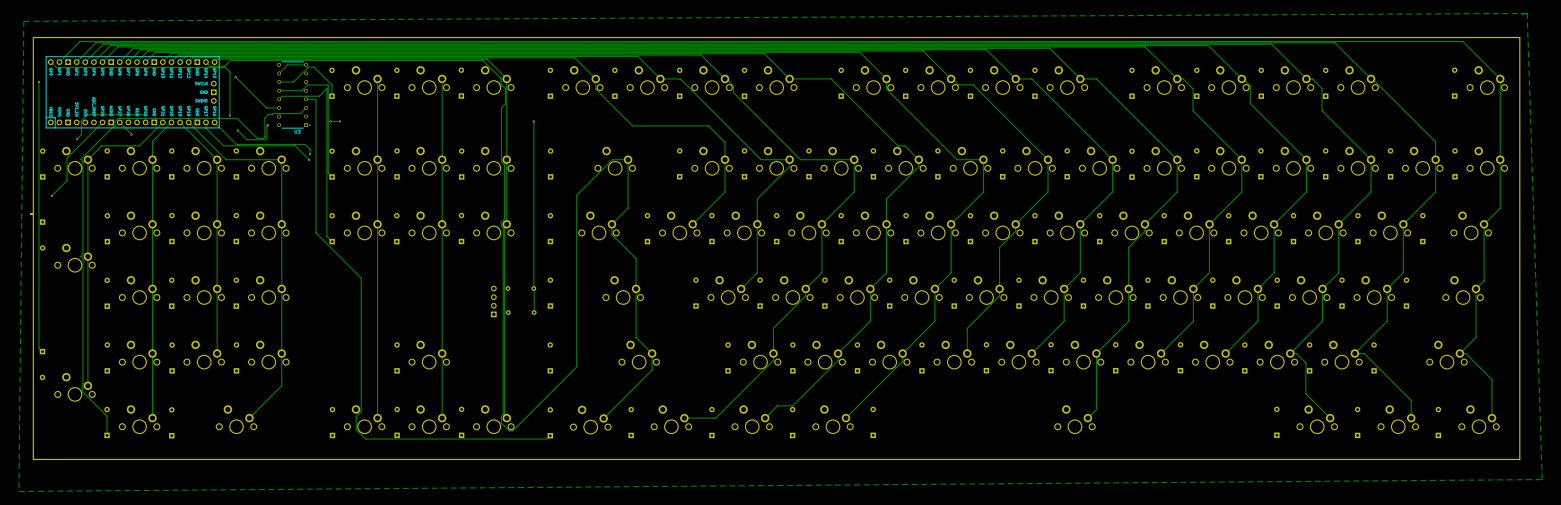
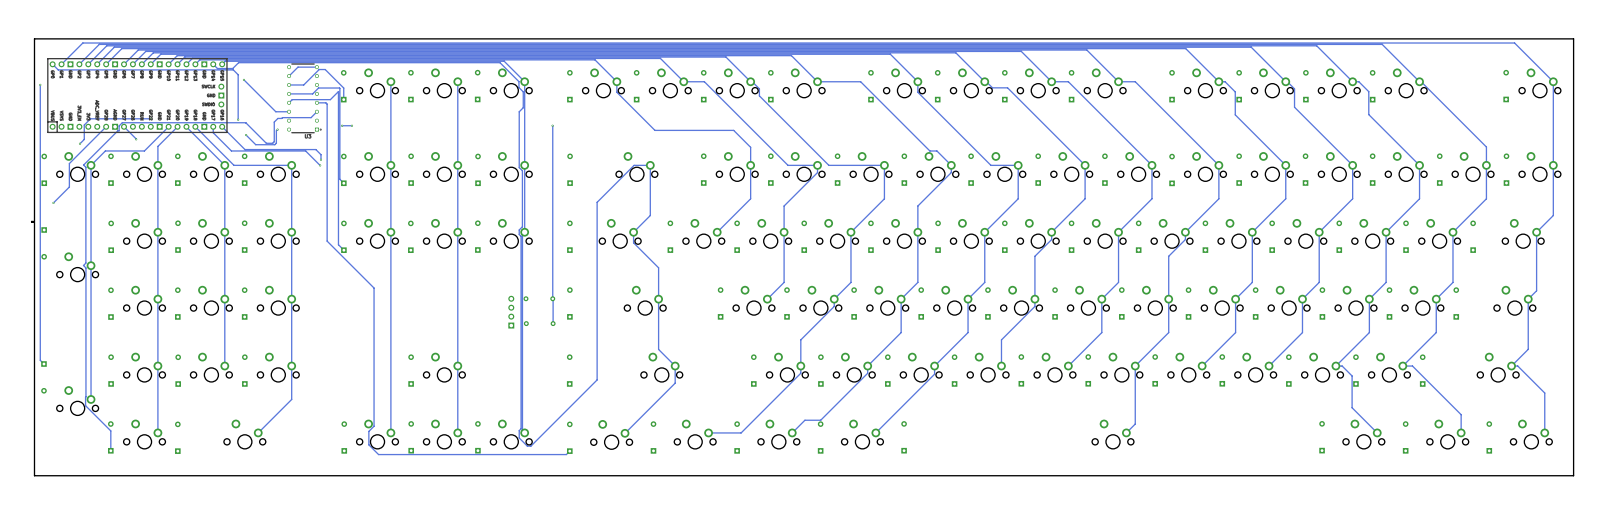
zone outline: (1527, 13) (1542, 479) (18, 491) (23, 21) (1527, 13) -> none

